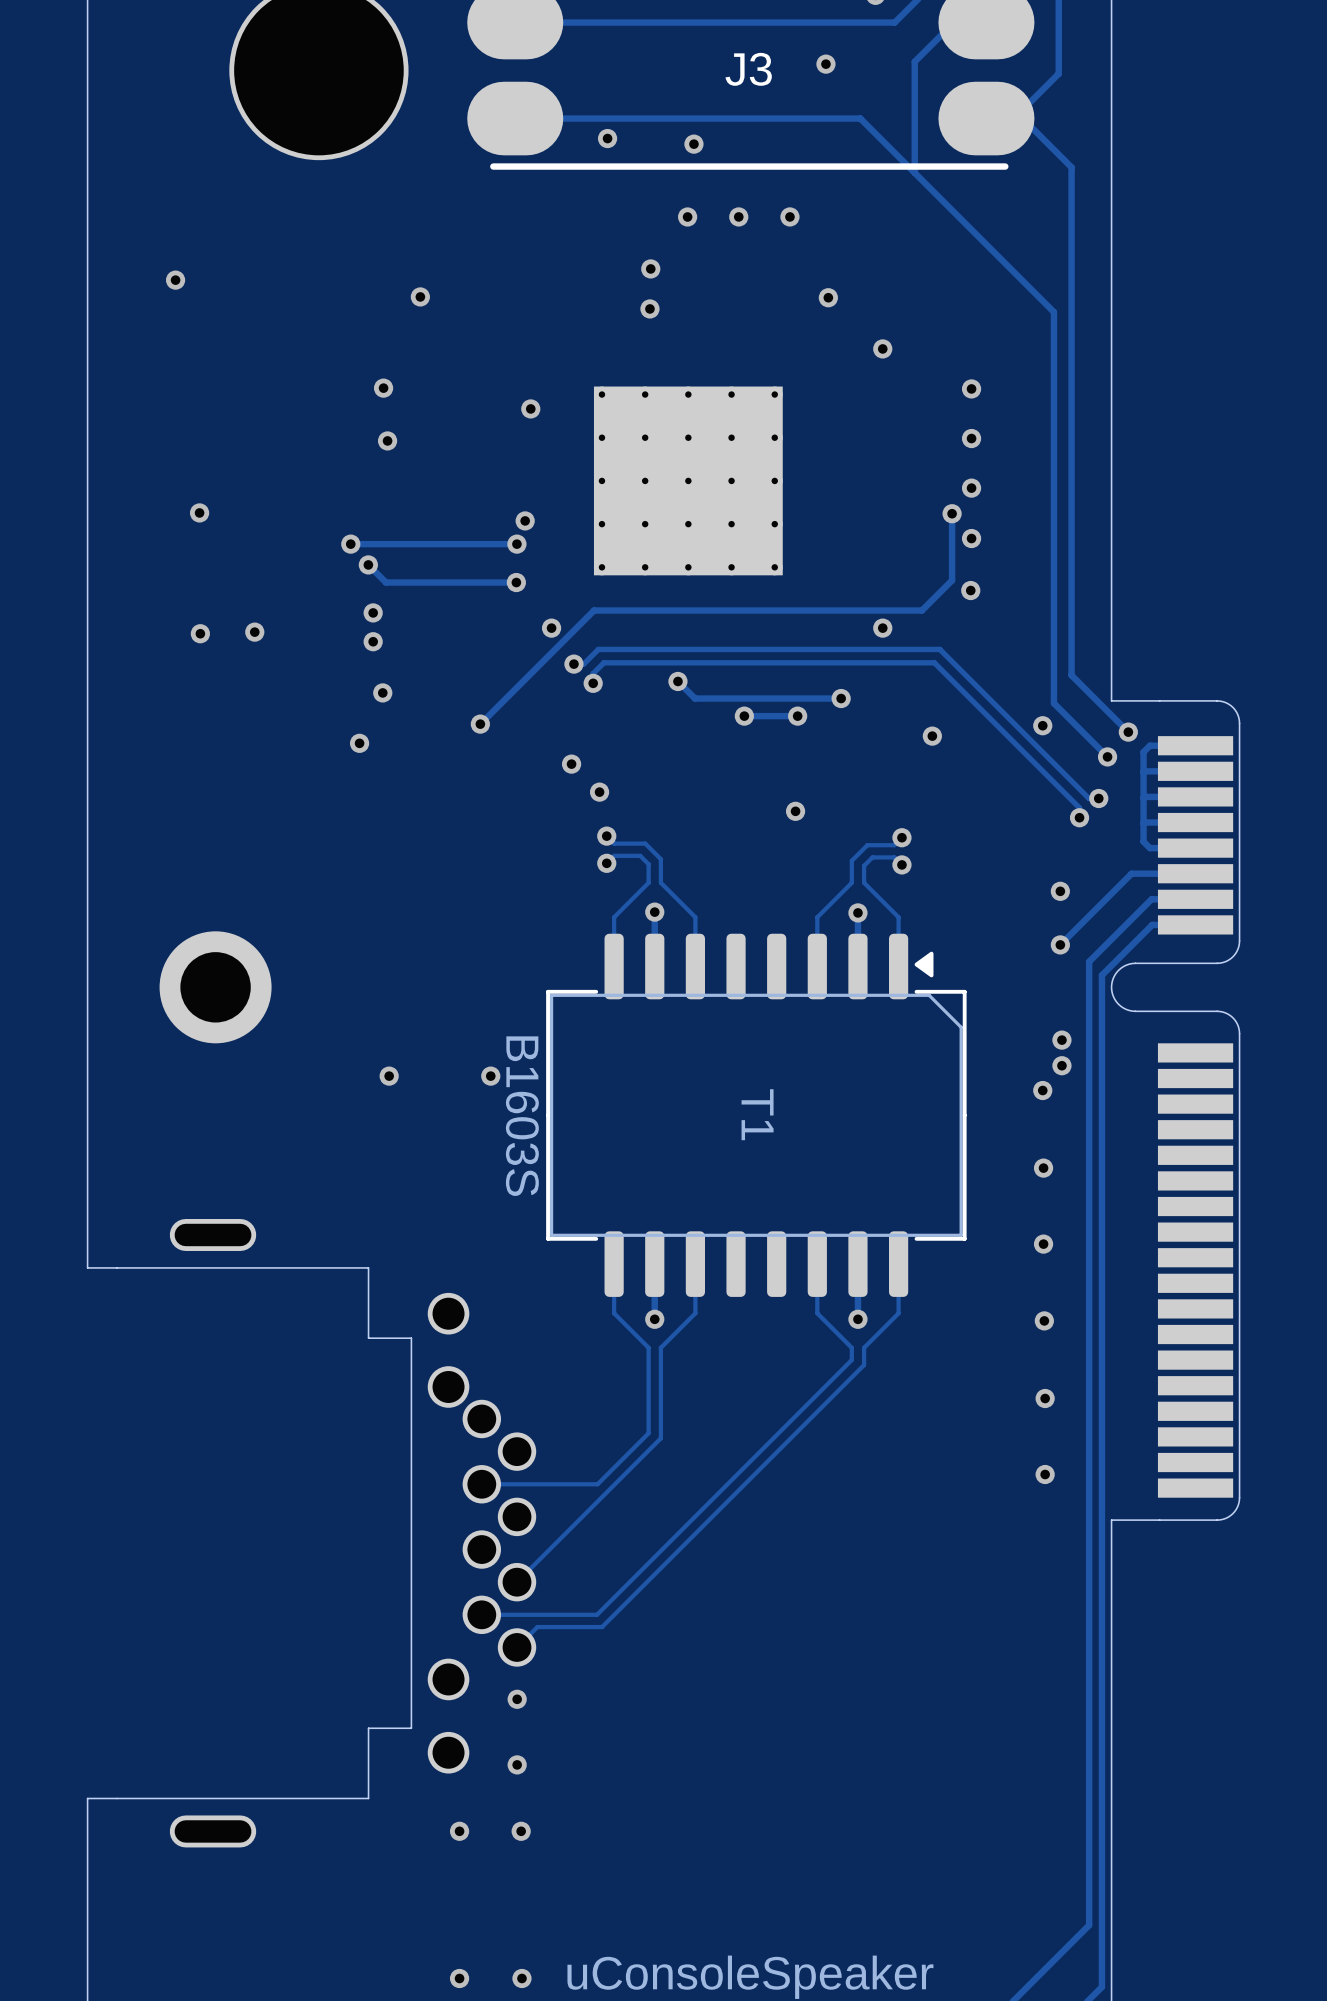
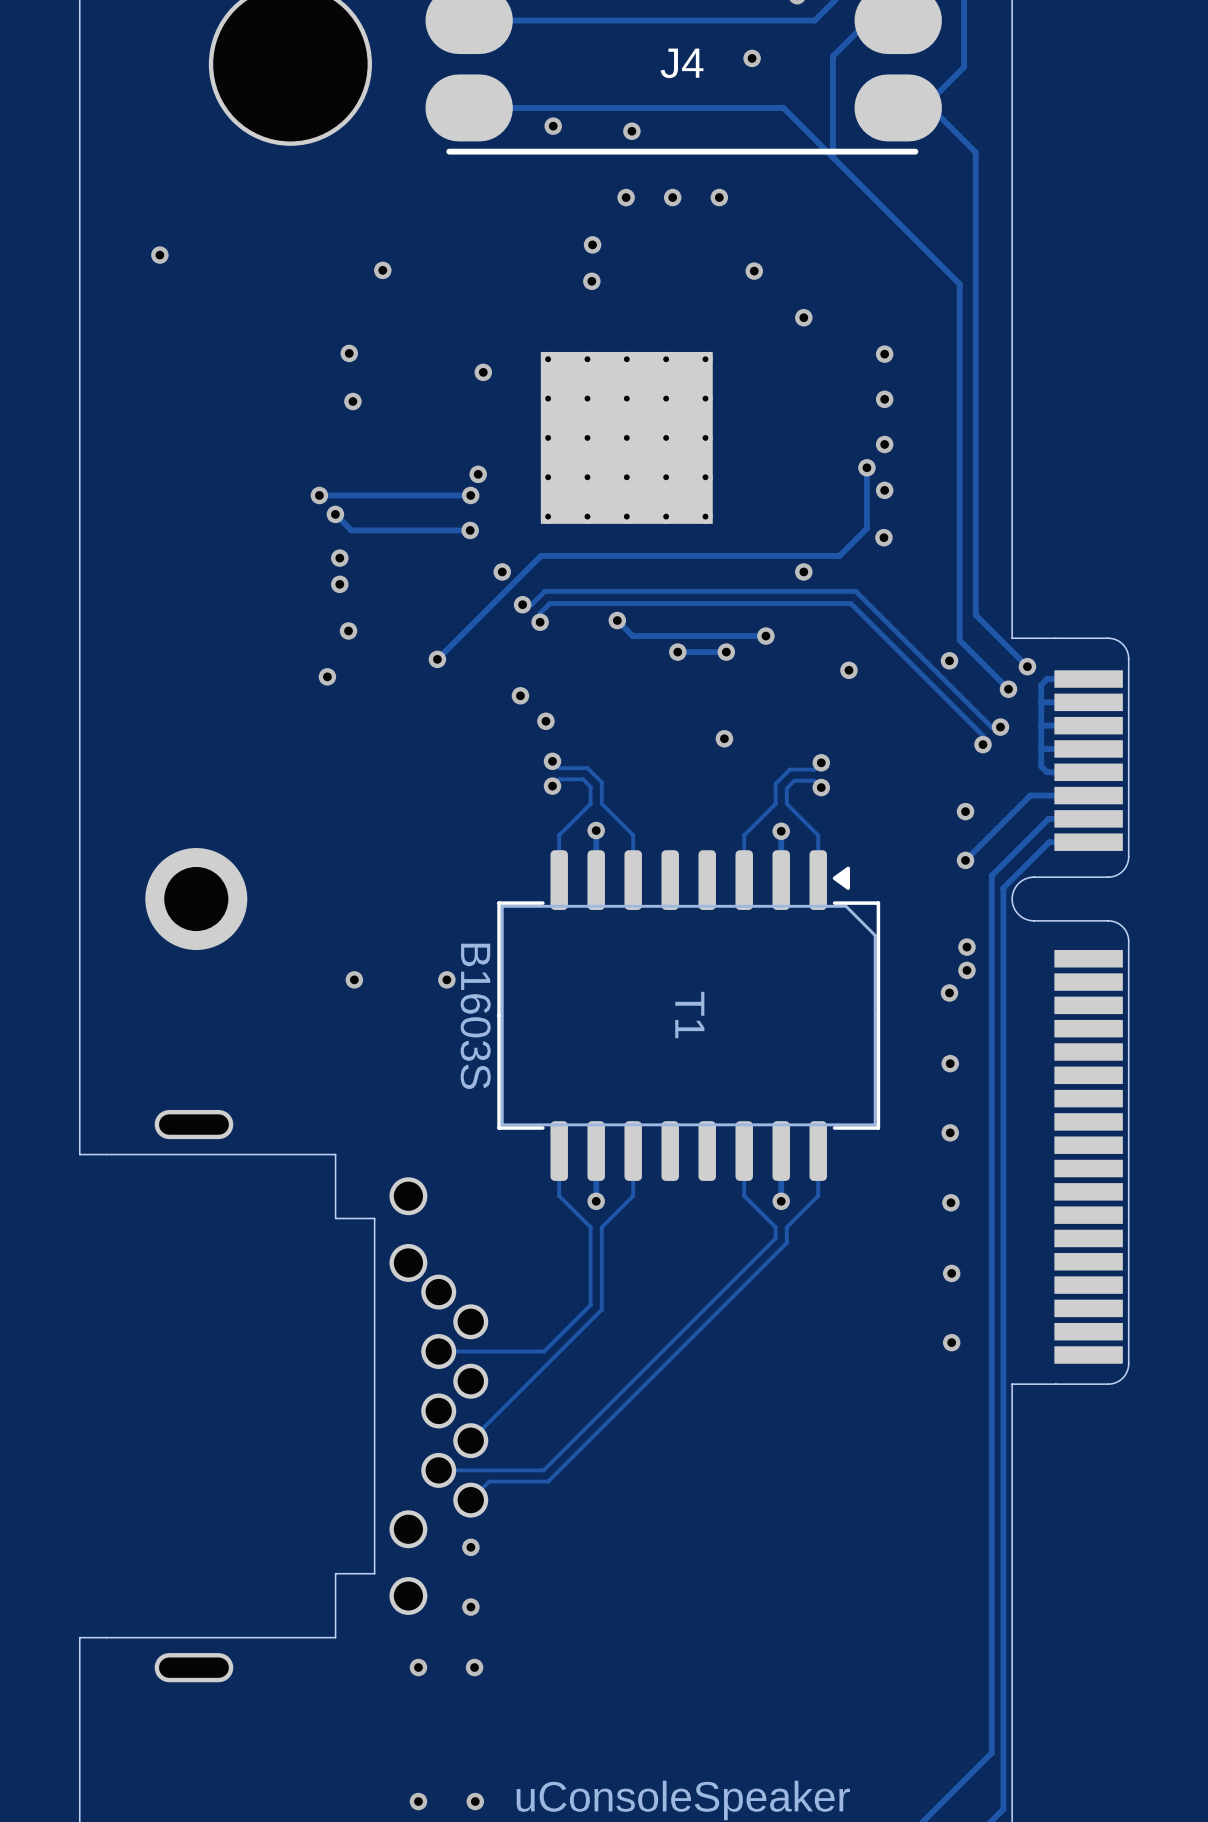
J3 name: J3 (748, 69) -> J4 (682, 63)
via: (199, 512) -> none
via: (254, 632) -> none
via: (200, 633) -> none

